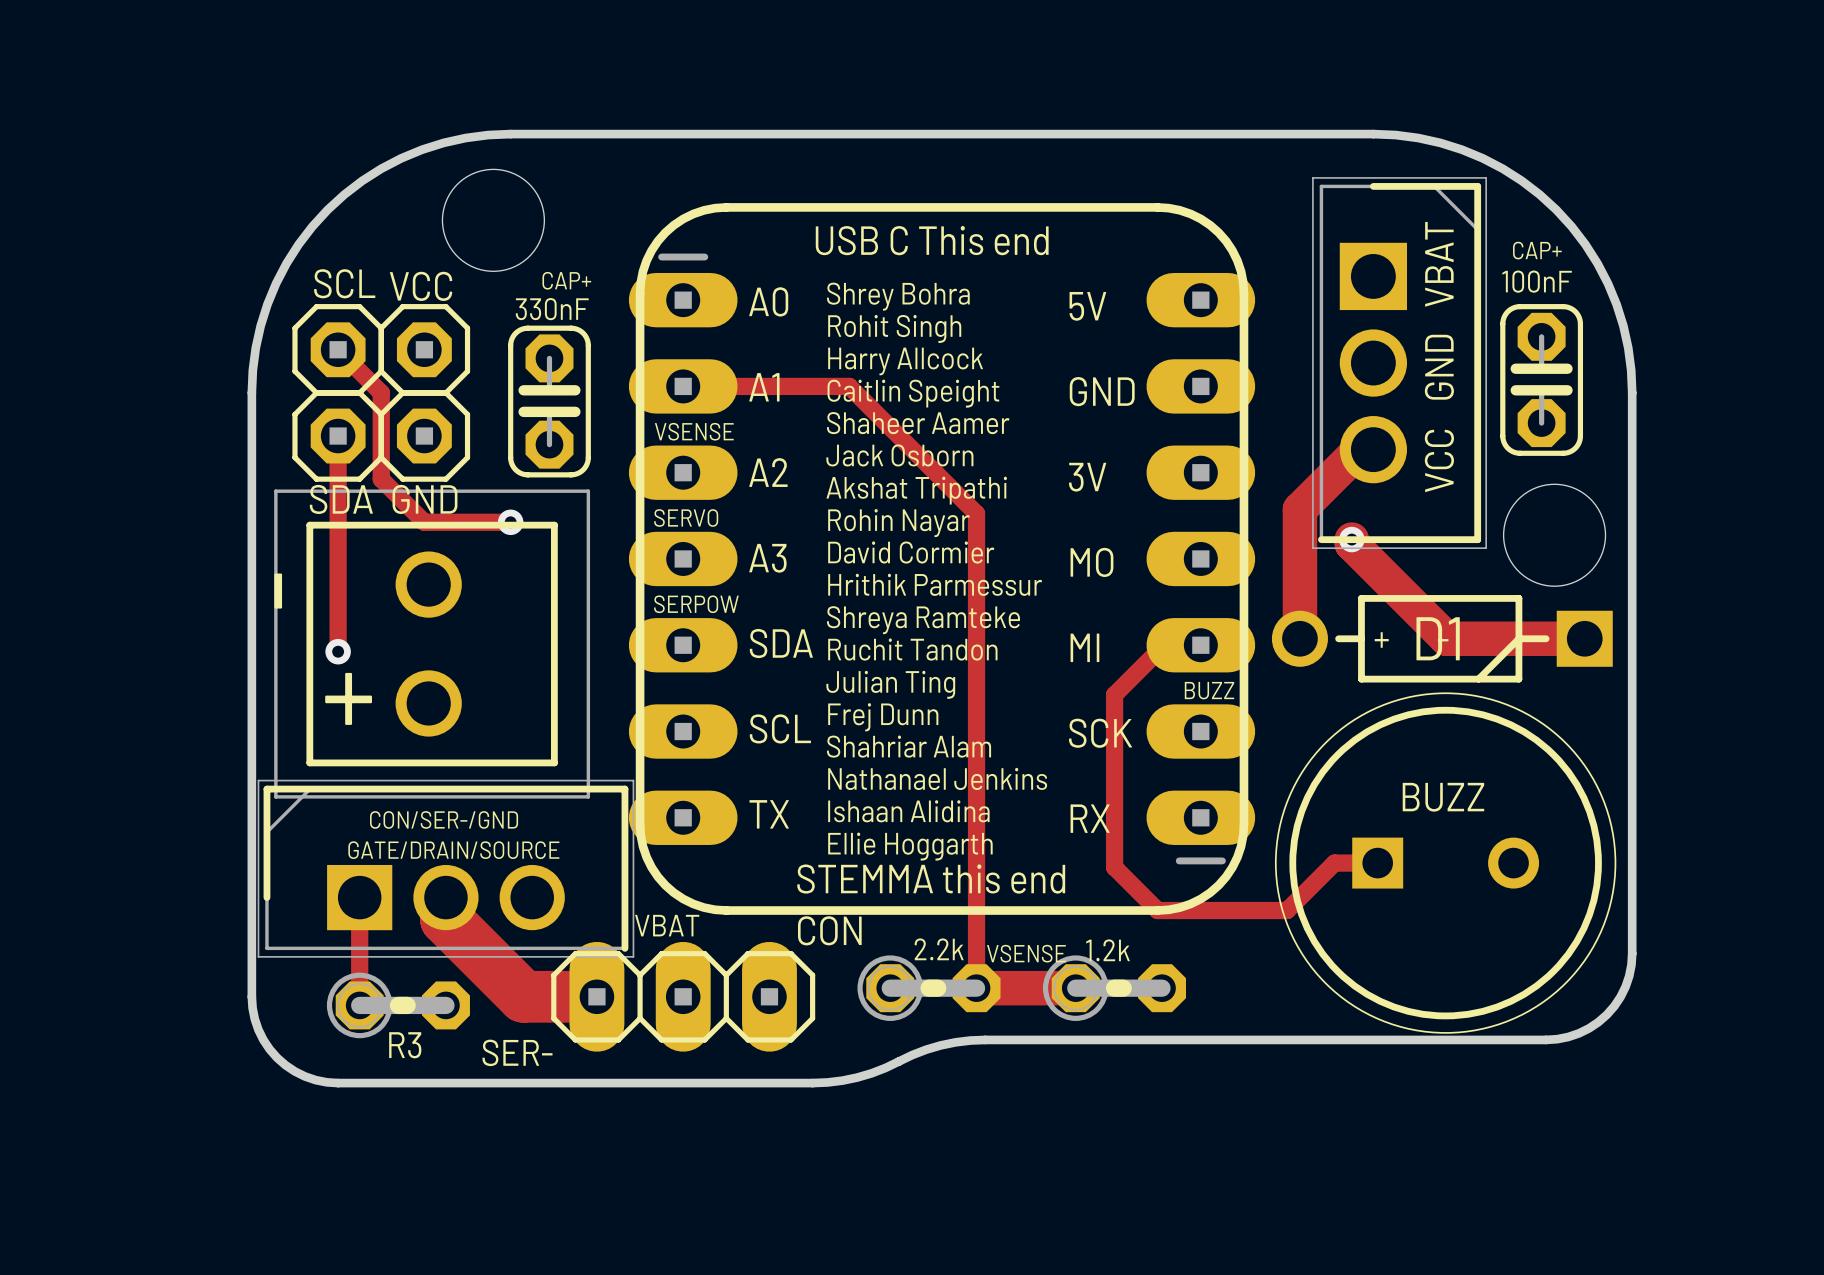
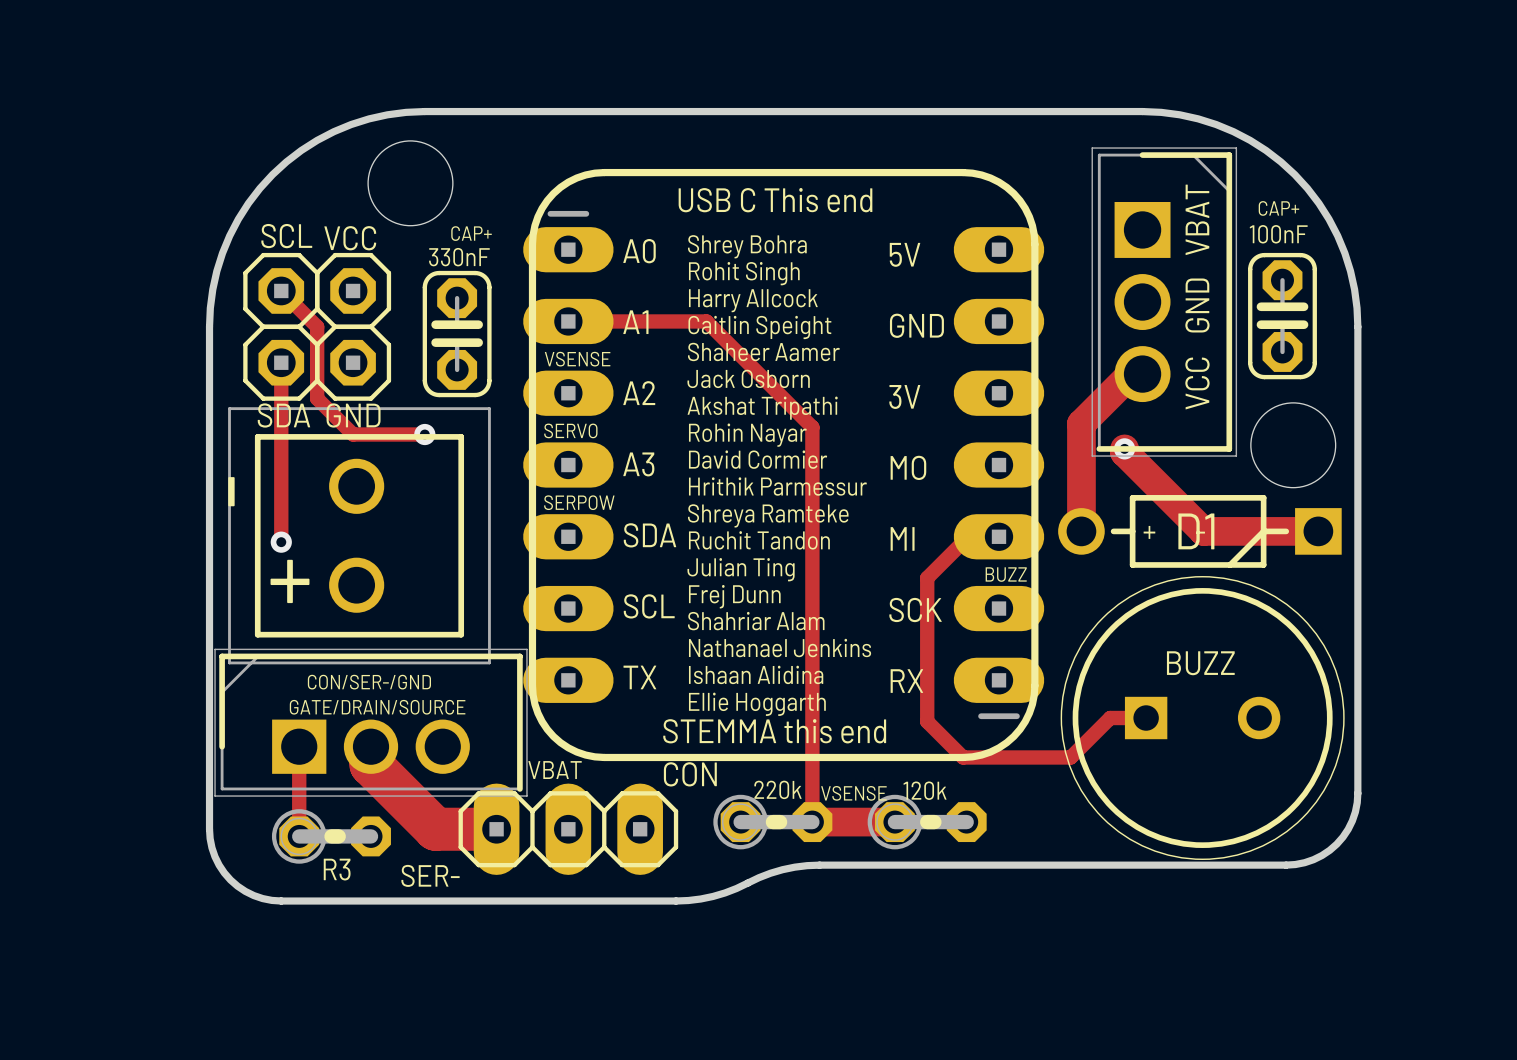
part value: 2.2k (939, 949) -> 220k (777, 789)
part value: 1.2k (1107, 950) -> 120k (925, 790)

